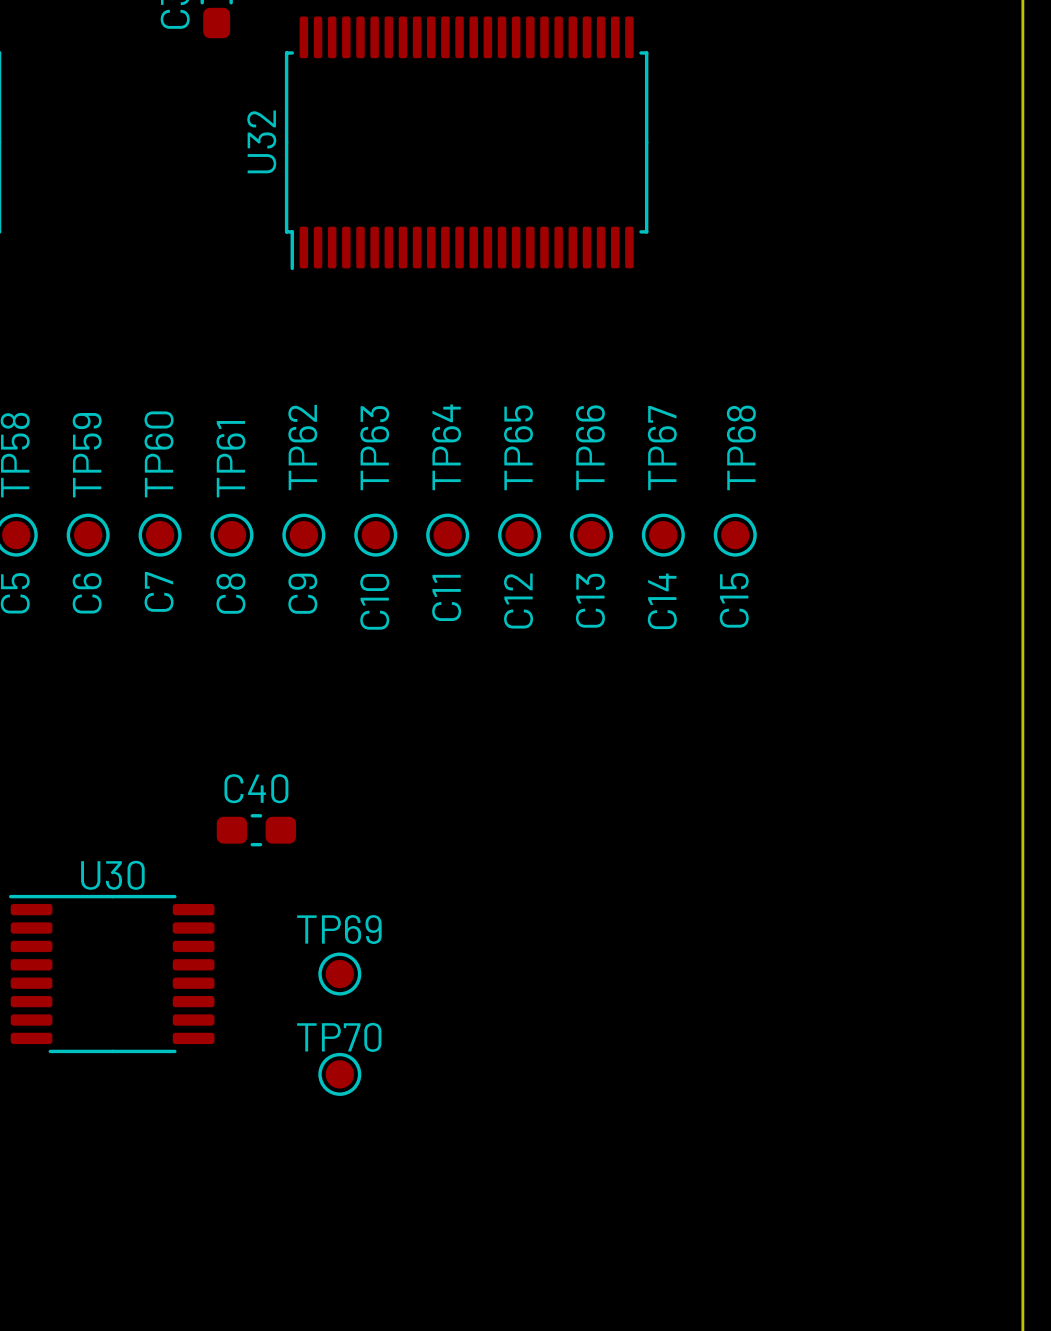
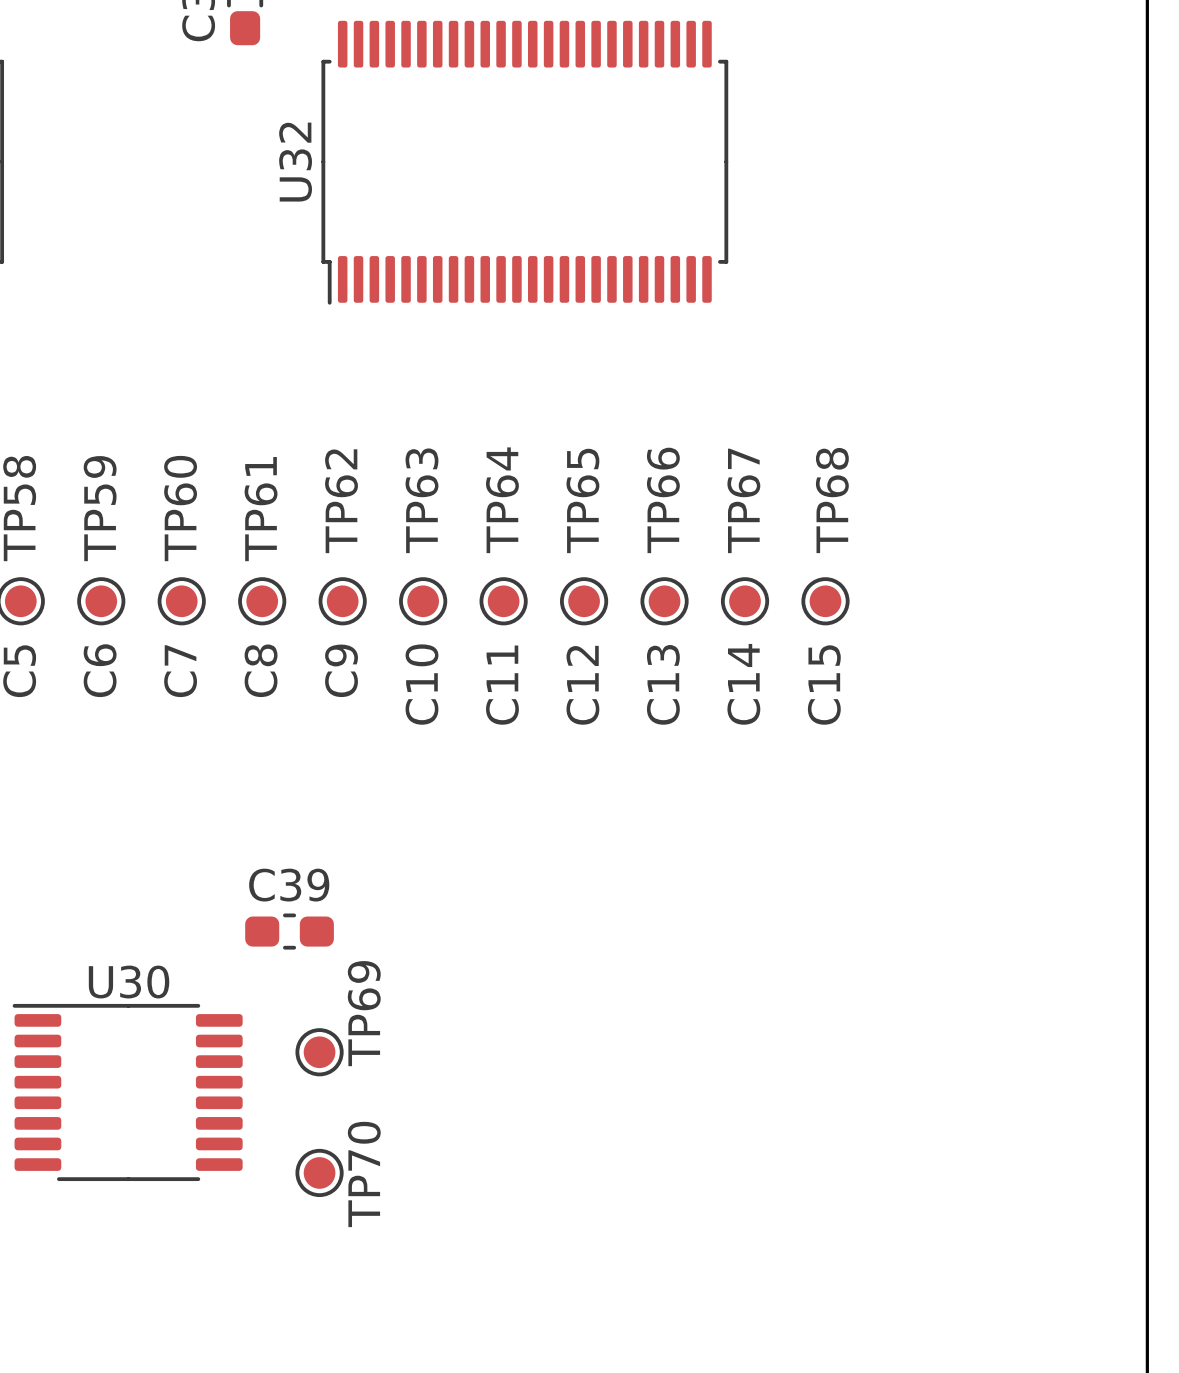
C40 name: C40 (256, 788) -> C39 (289, 885)
TP69 name rotation: 0° (339, 929) -> 90° counterclockwise (364, 1013)
TP69 position: (339, 974) -> (319, 1052)
TP70 name rotation: 0° (339, 1037) -> 90° counterclockwise (364, 1174)
TP70 position: (339, 1074) -> (319, 1172)

